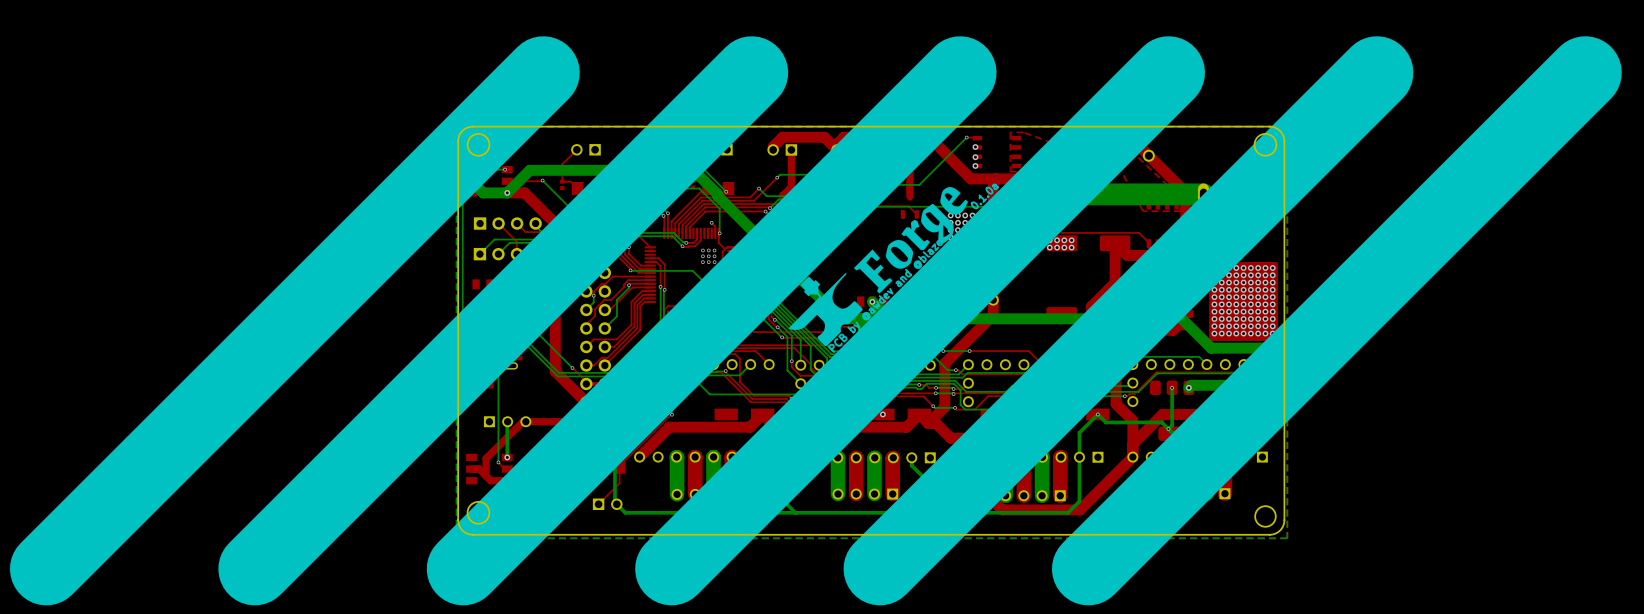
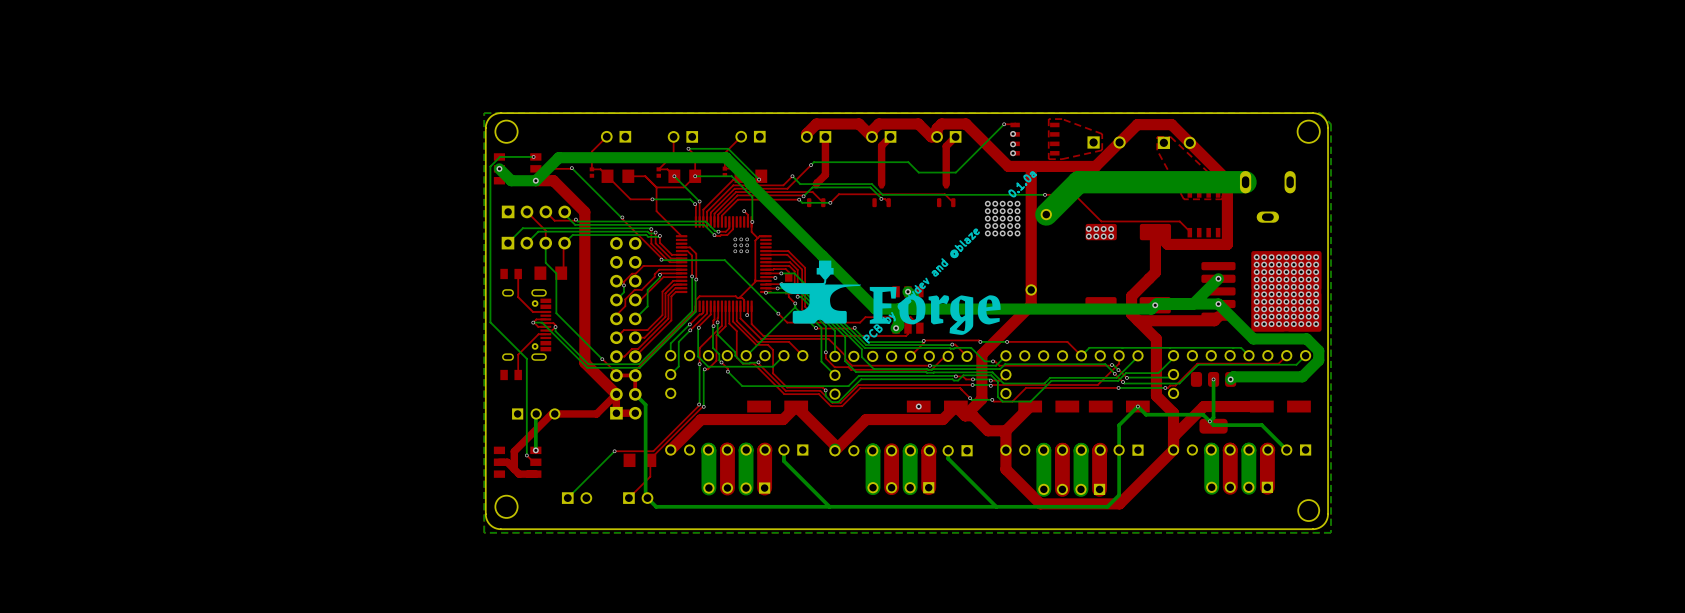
line: (543, 72) (46, 568) -> none
line: (751, 72) (254, 568) -> none
line: (960, 72) (463, 568) -> none
line: (1168, 72) (671, 568) -> none
line: (1376, 72) (879, 568) -> none
line: (1585, 72) (1088, 568) -> none
drawing: [788, 187, 969, 347] -> none
drawing: none -> [779, 260, 1001, 335]

